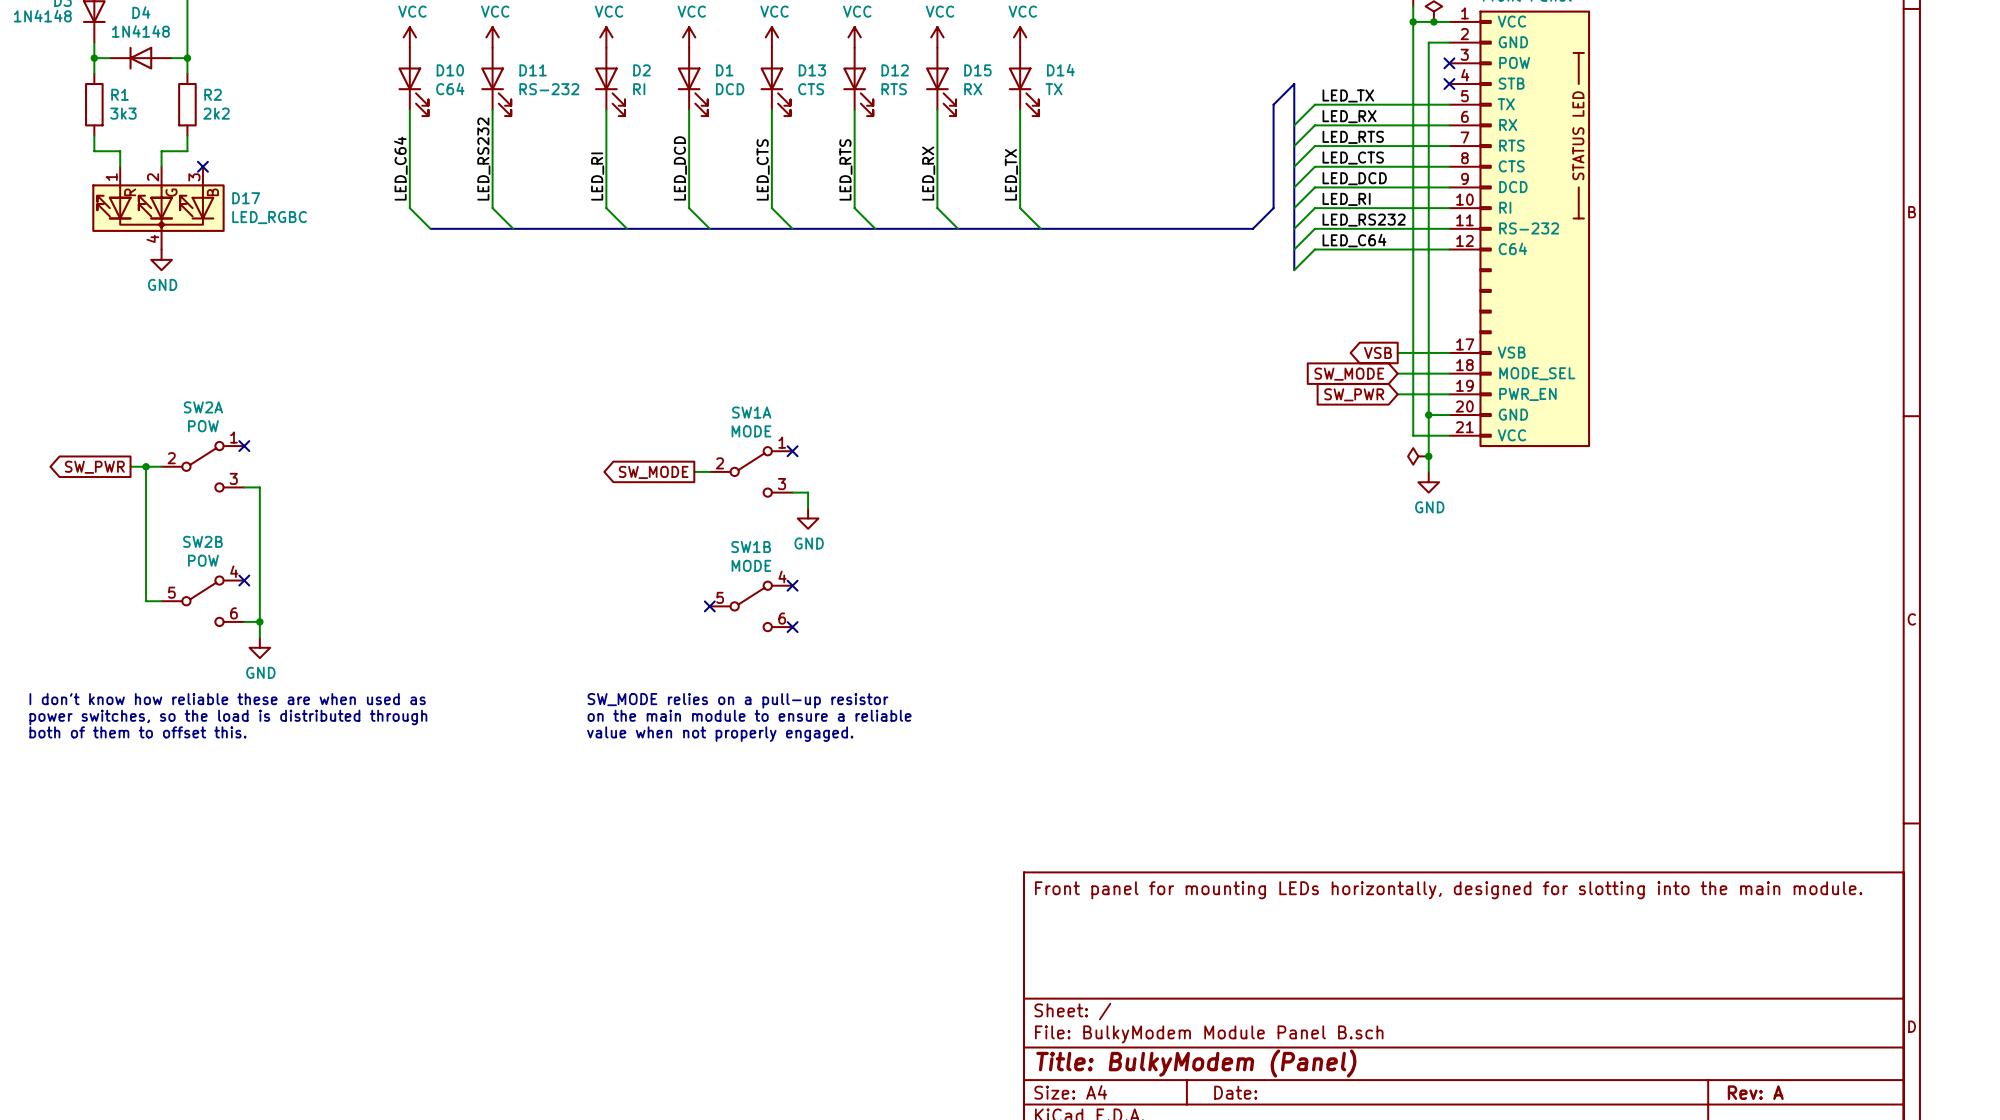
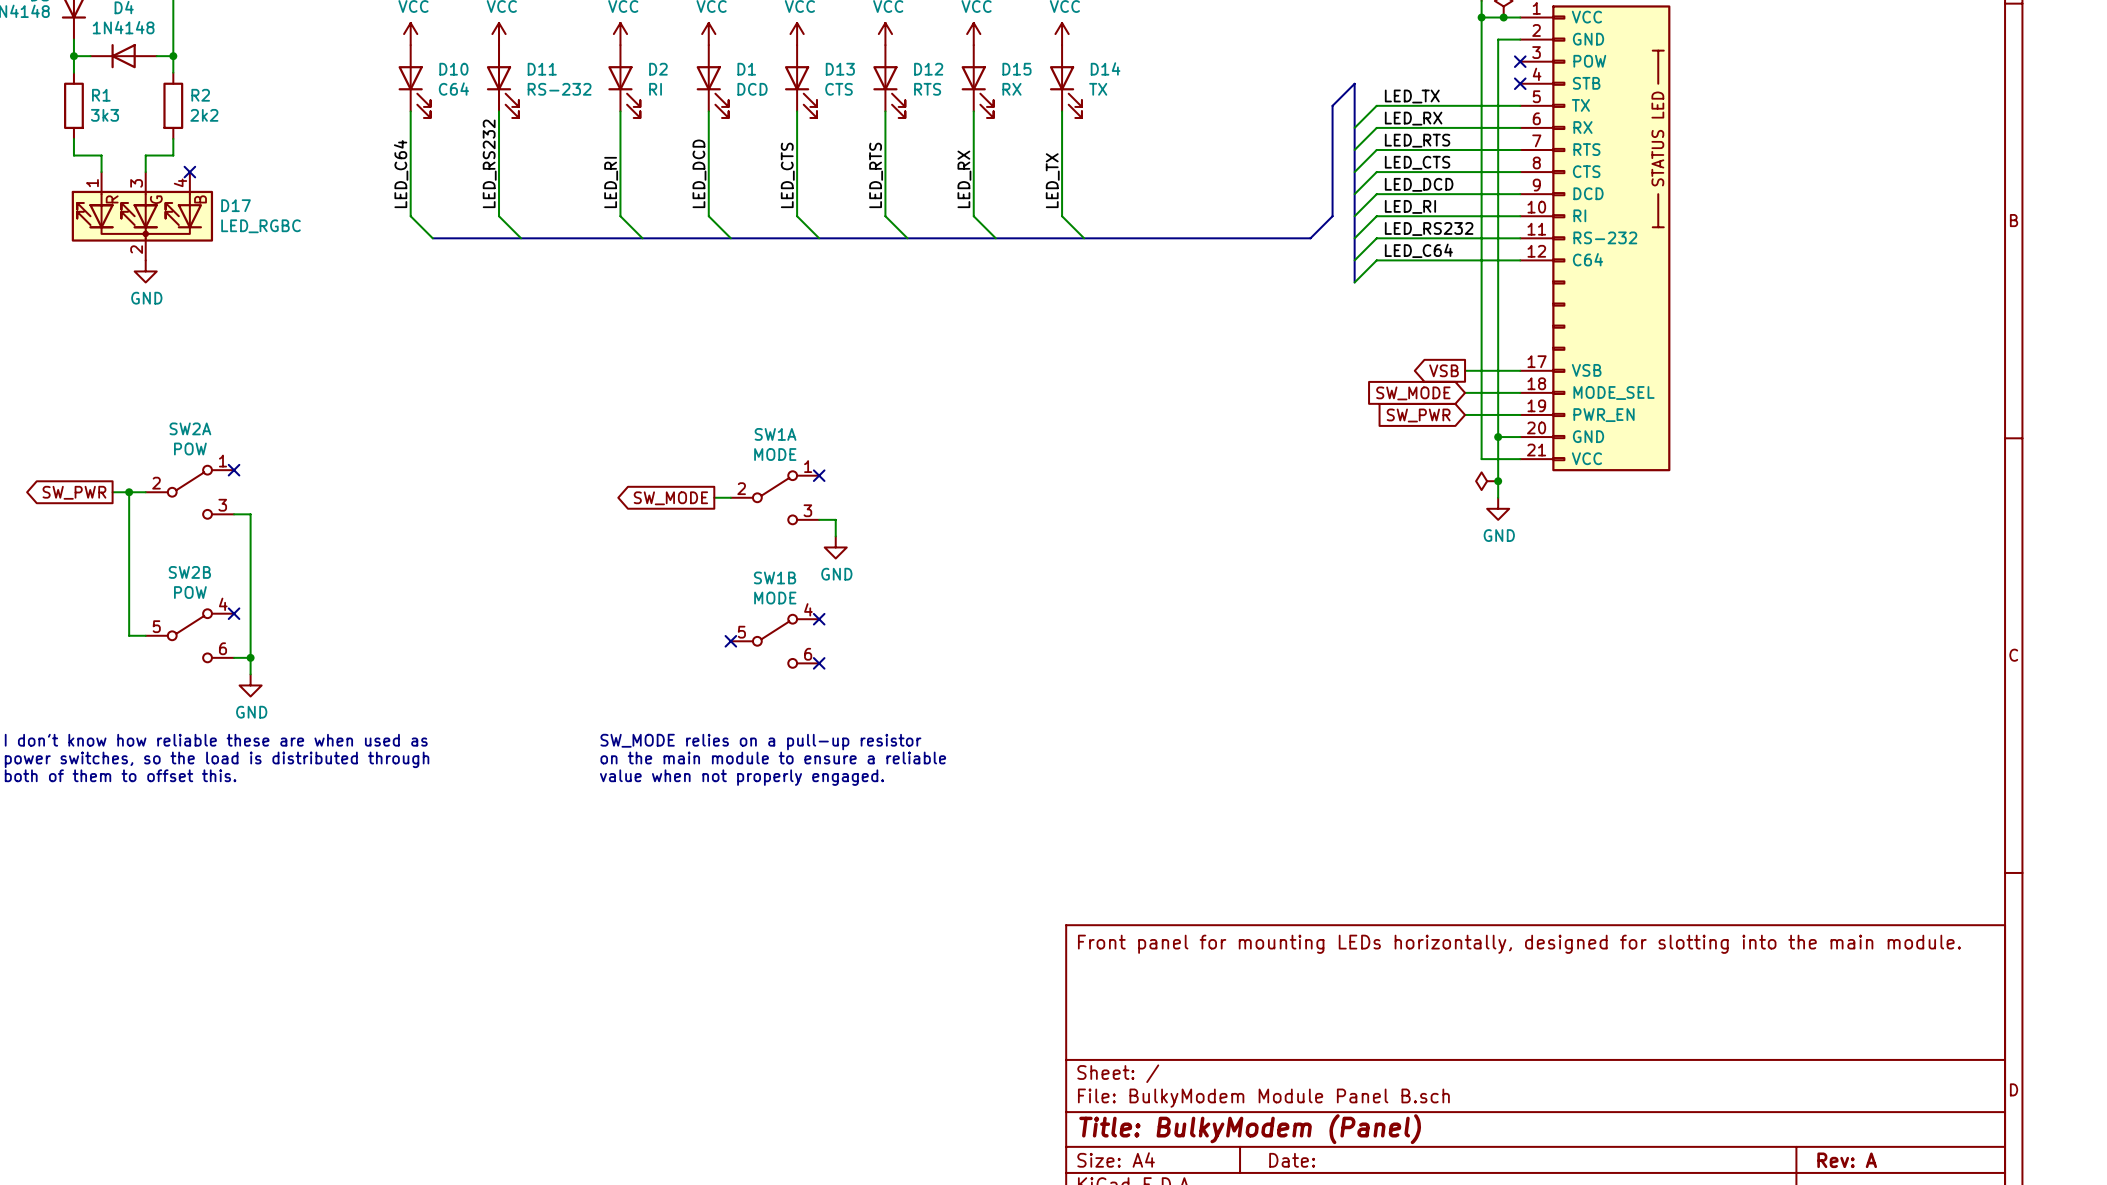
D17 pin number: 2 (153, 177) -> 3 (136, 183)
D17 pin number: 3 (194, 177) -> 4 (180, 182)
D17 pin number: 4 (152, 238) -> 2 (136, 249)

